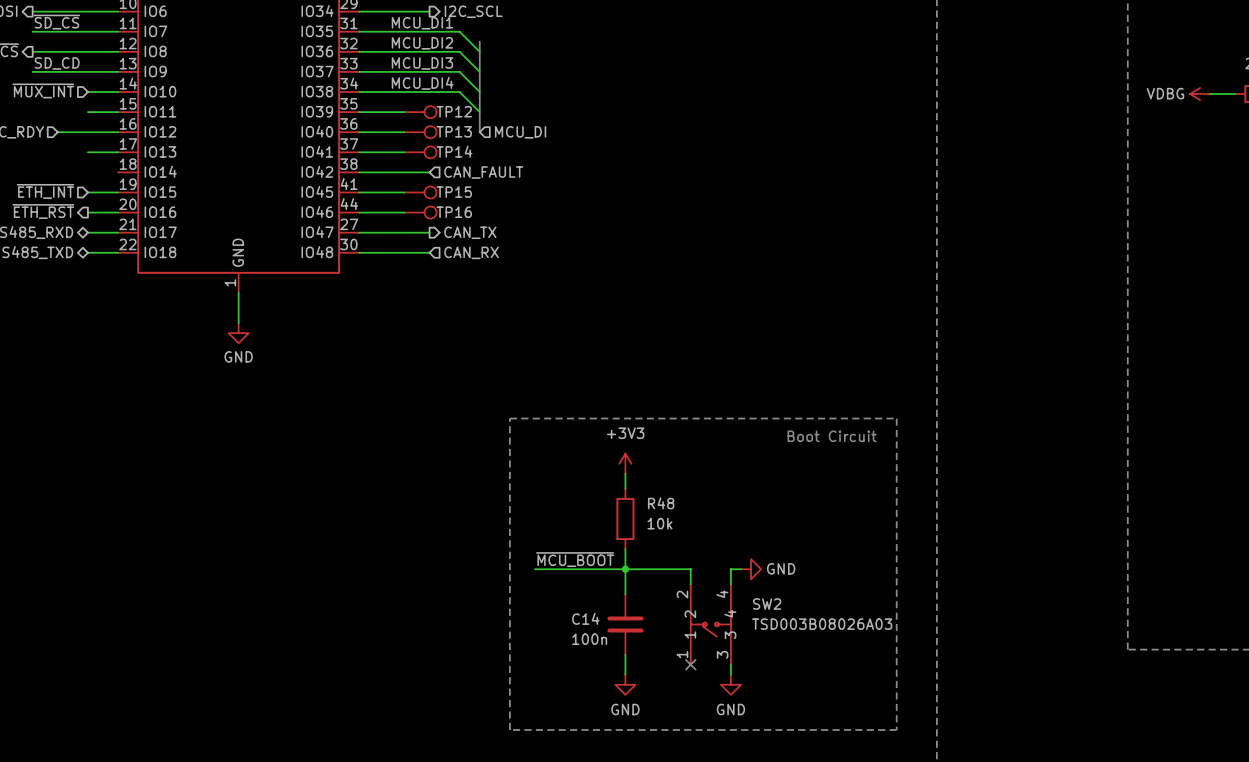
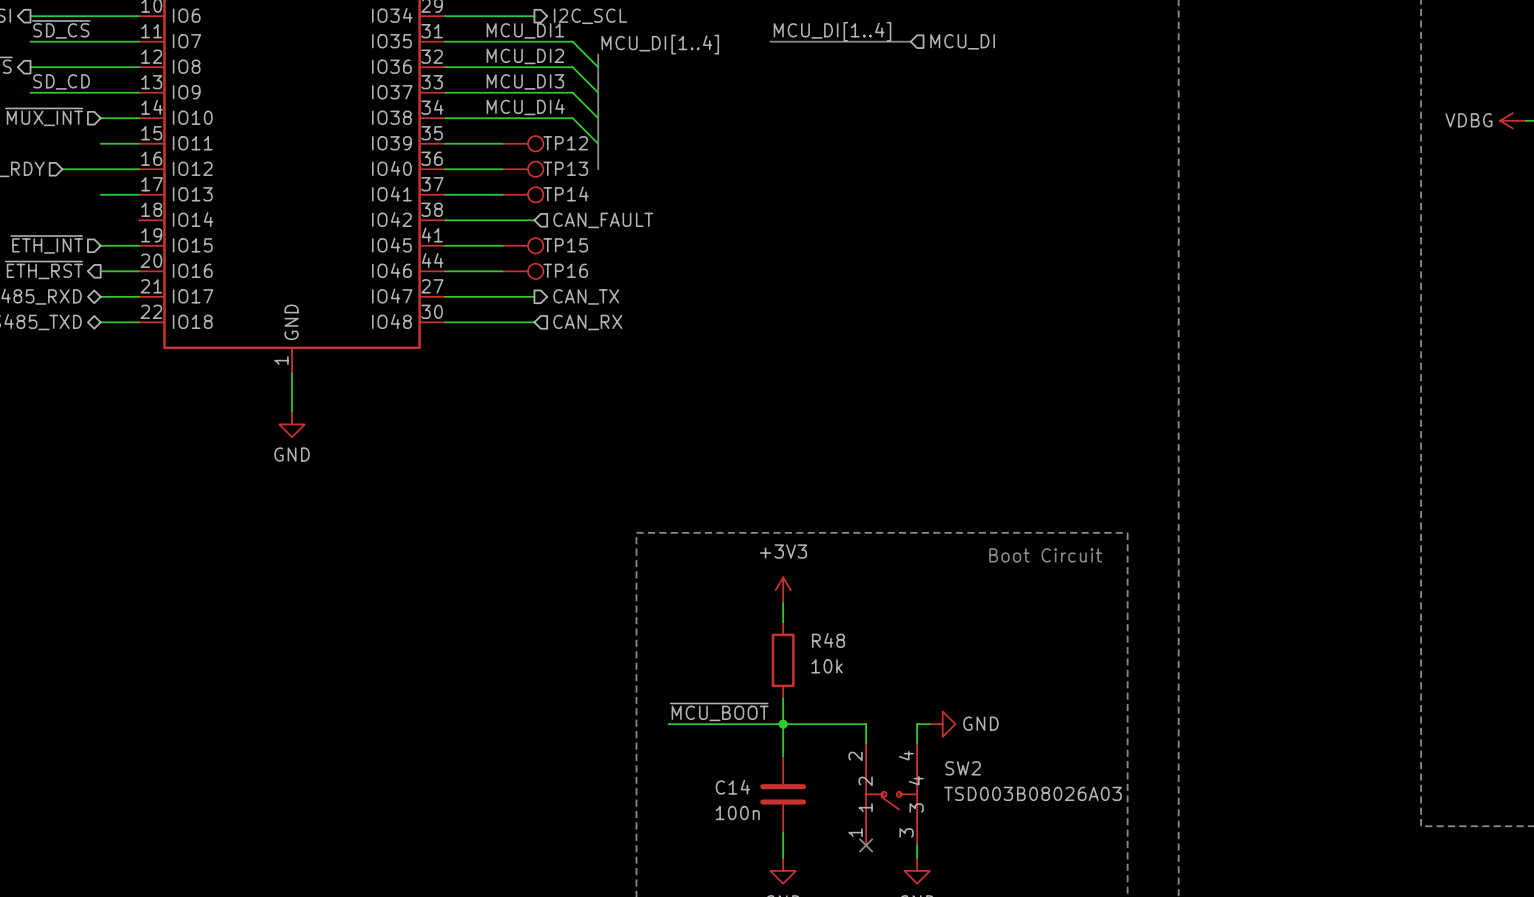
label: none -> MCU_DI[1..4] (832, 31)
bus: none -> (770, 41) (910, 41)
hierarchical label: none -> MCU_DI (962, 41)
label: none -> MCU_DI[1..4] (660, 44)
hierarchical label: MCU_DI (520, 132) -> none

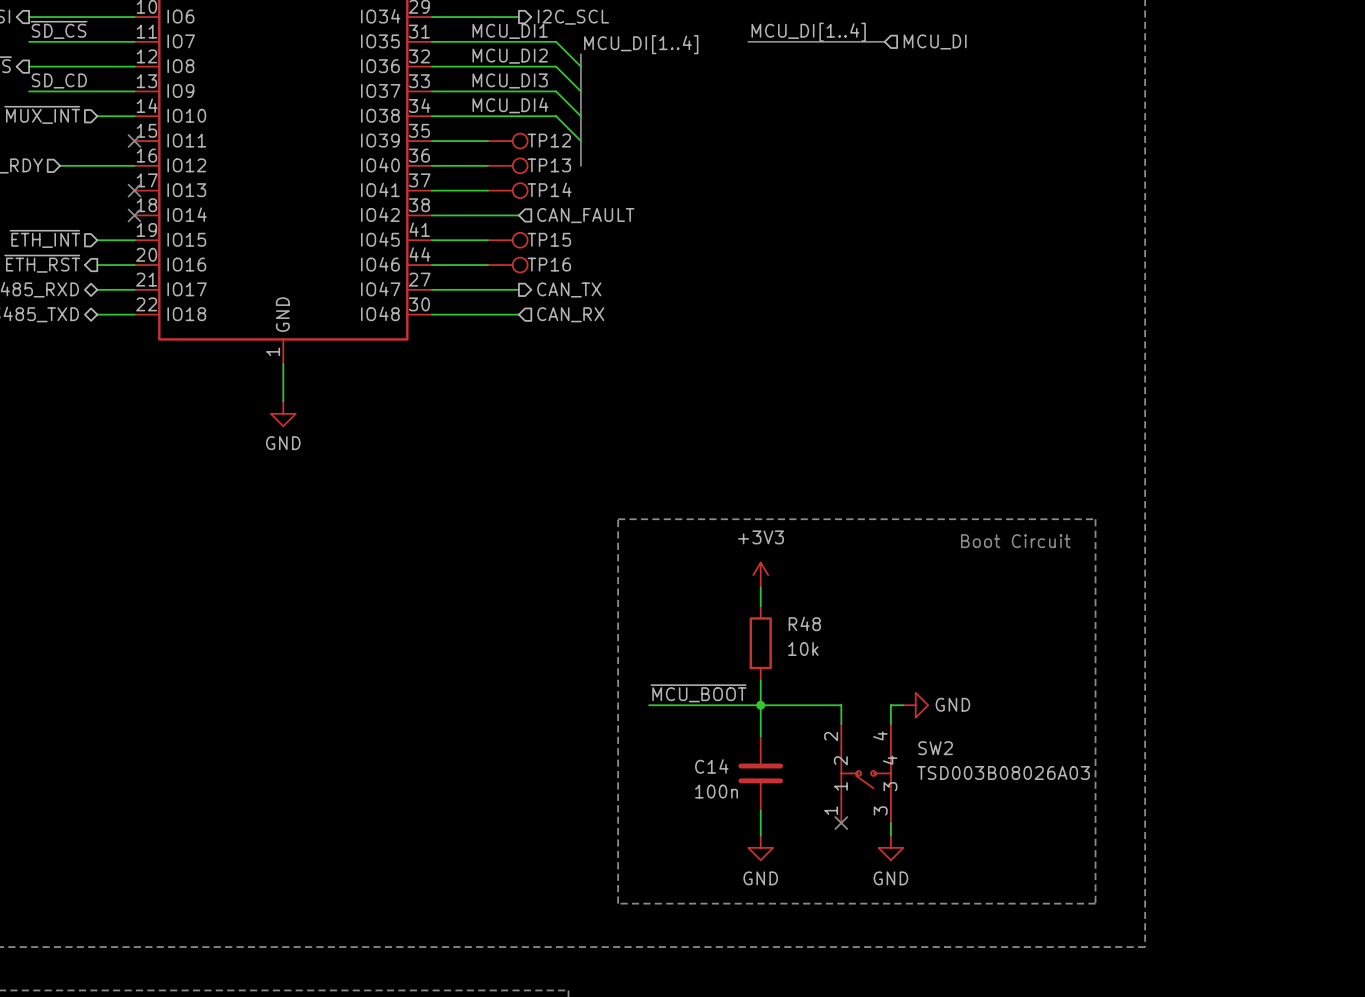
wire: (100, 143) (138, 143) -> none
no-connect mark: none -> (134, 141)
wire: (100, 194) (138, 194) -> none
no-connect mark: none -> (134, 190)
no-connect mark: none -> (134, 215)

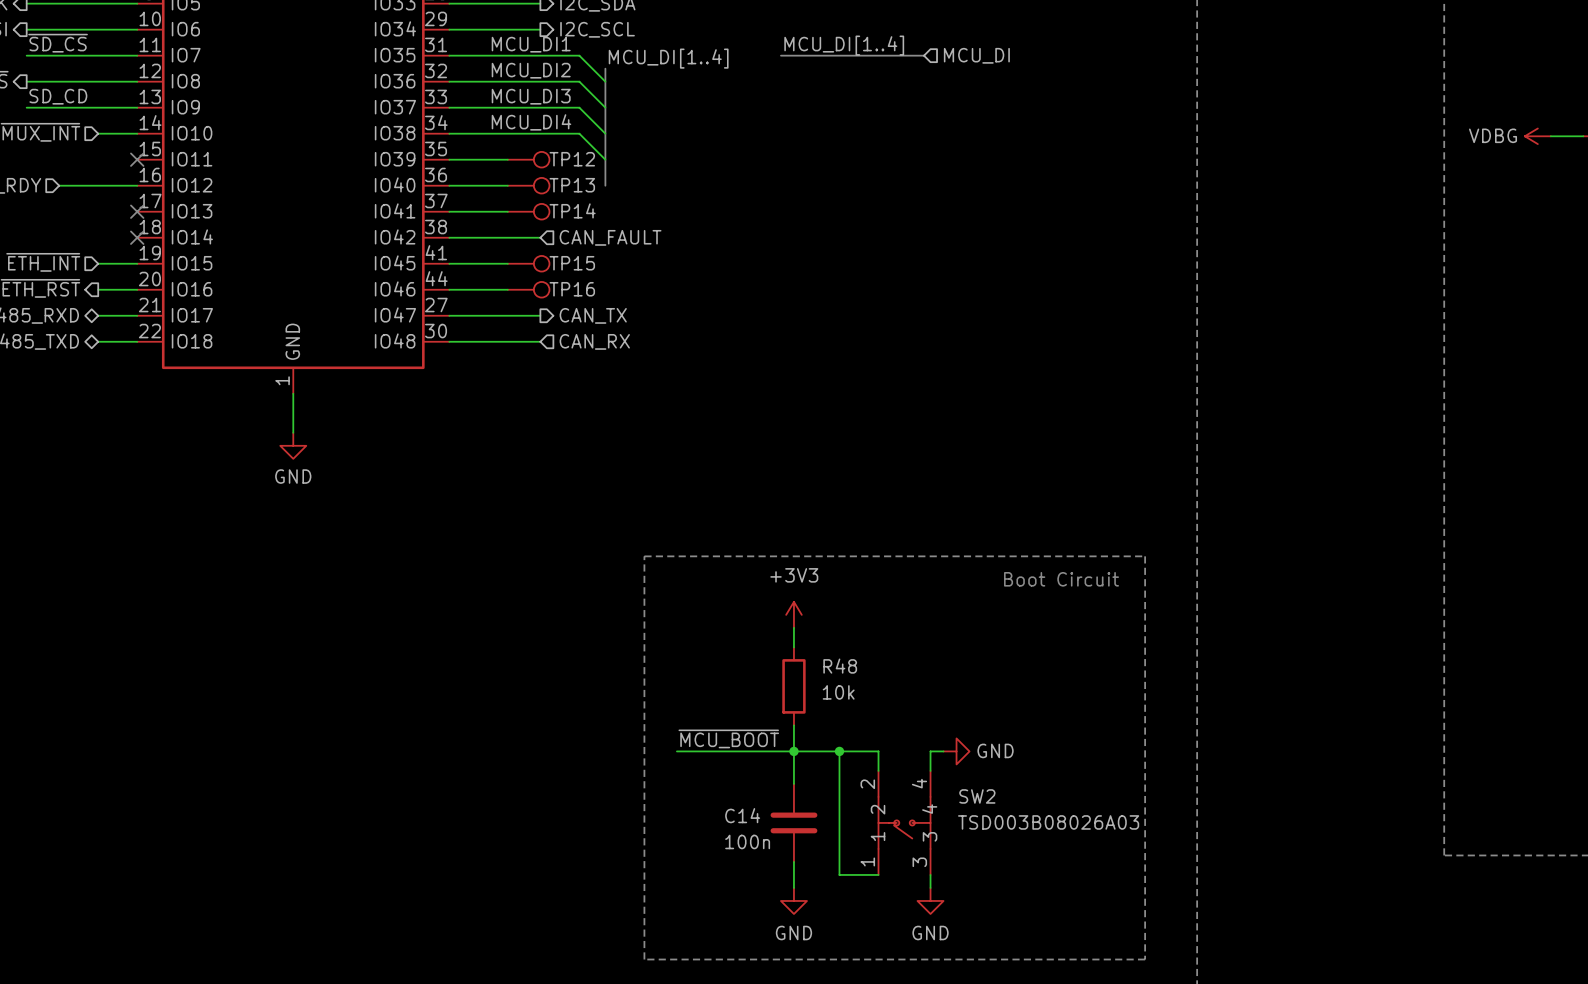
wire: none -> (839, 751) (839, 874) (878, 874)
junction: none -> (839, 751)
no-connect mark: (841, 823) -> none

